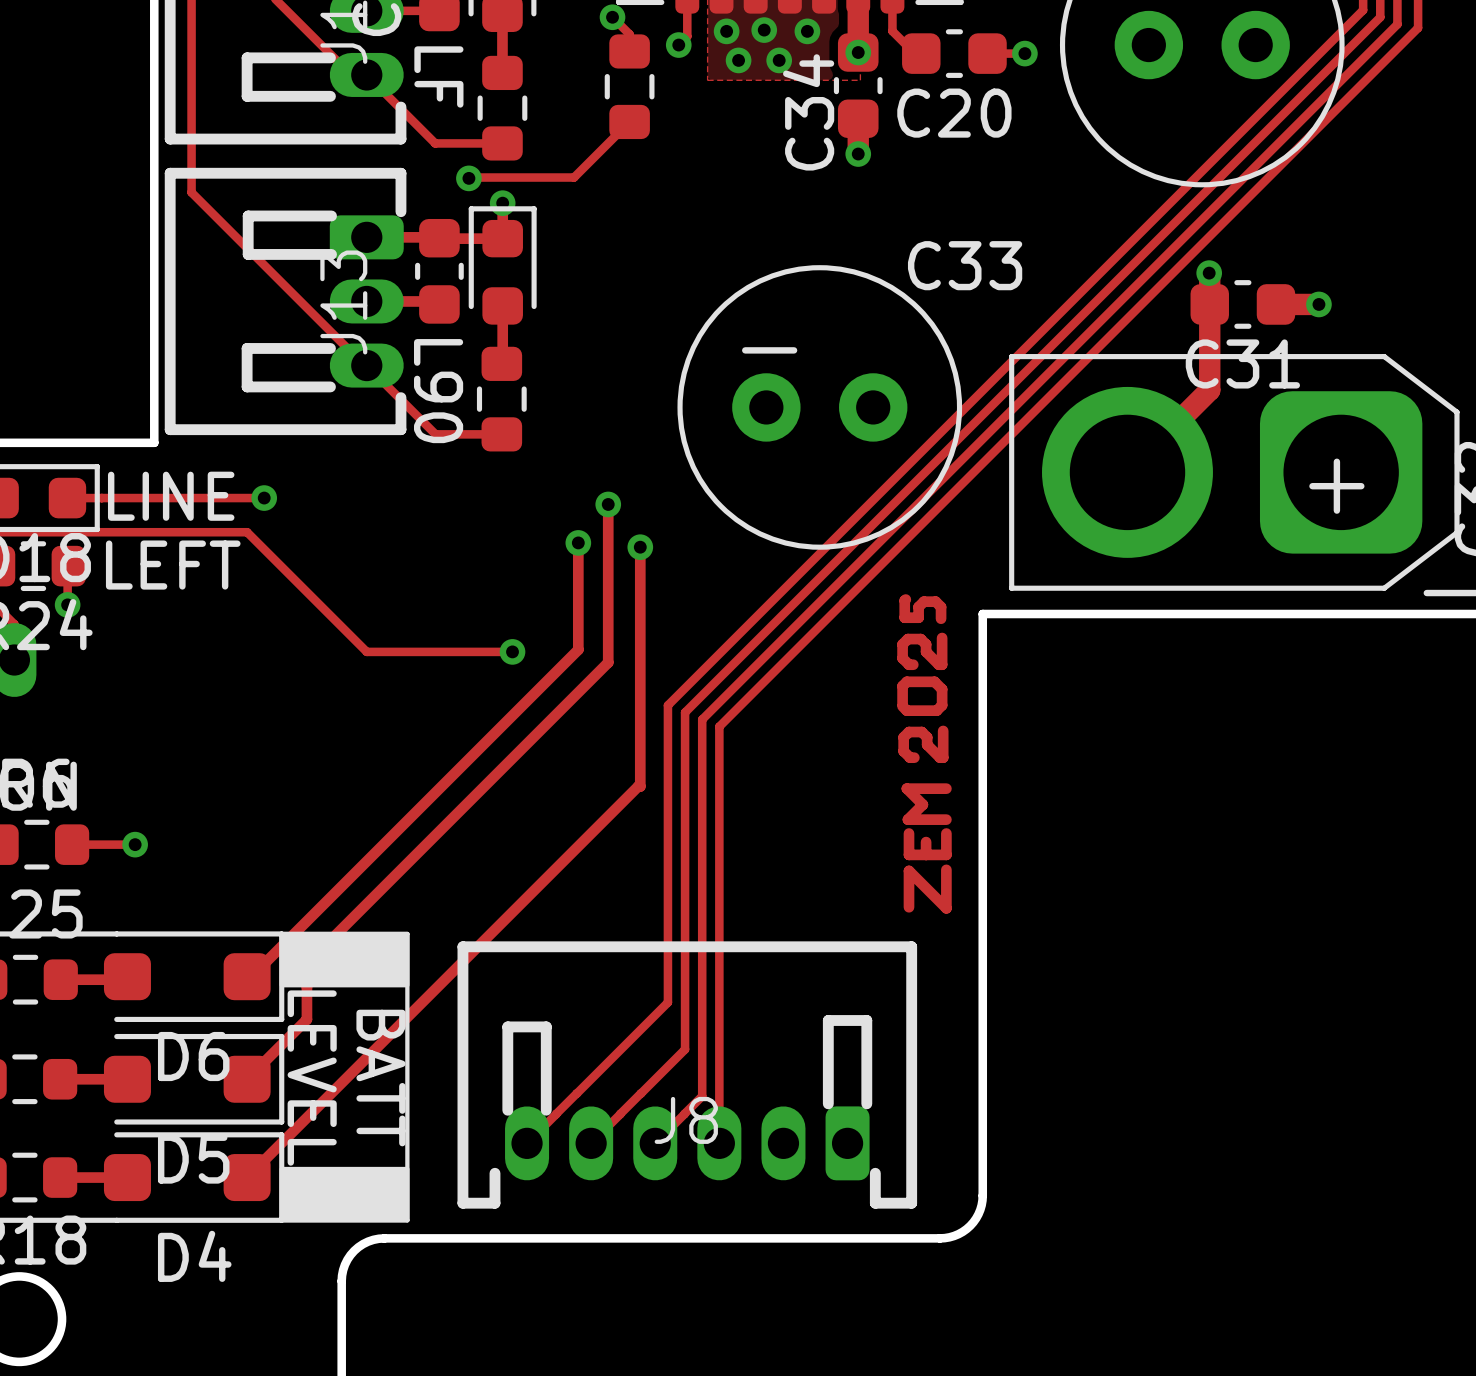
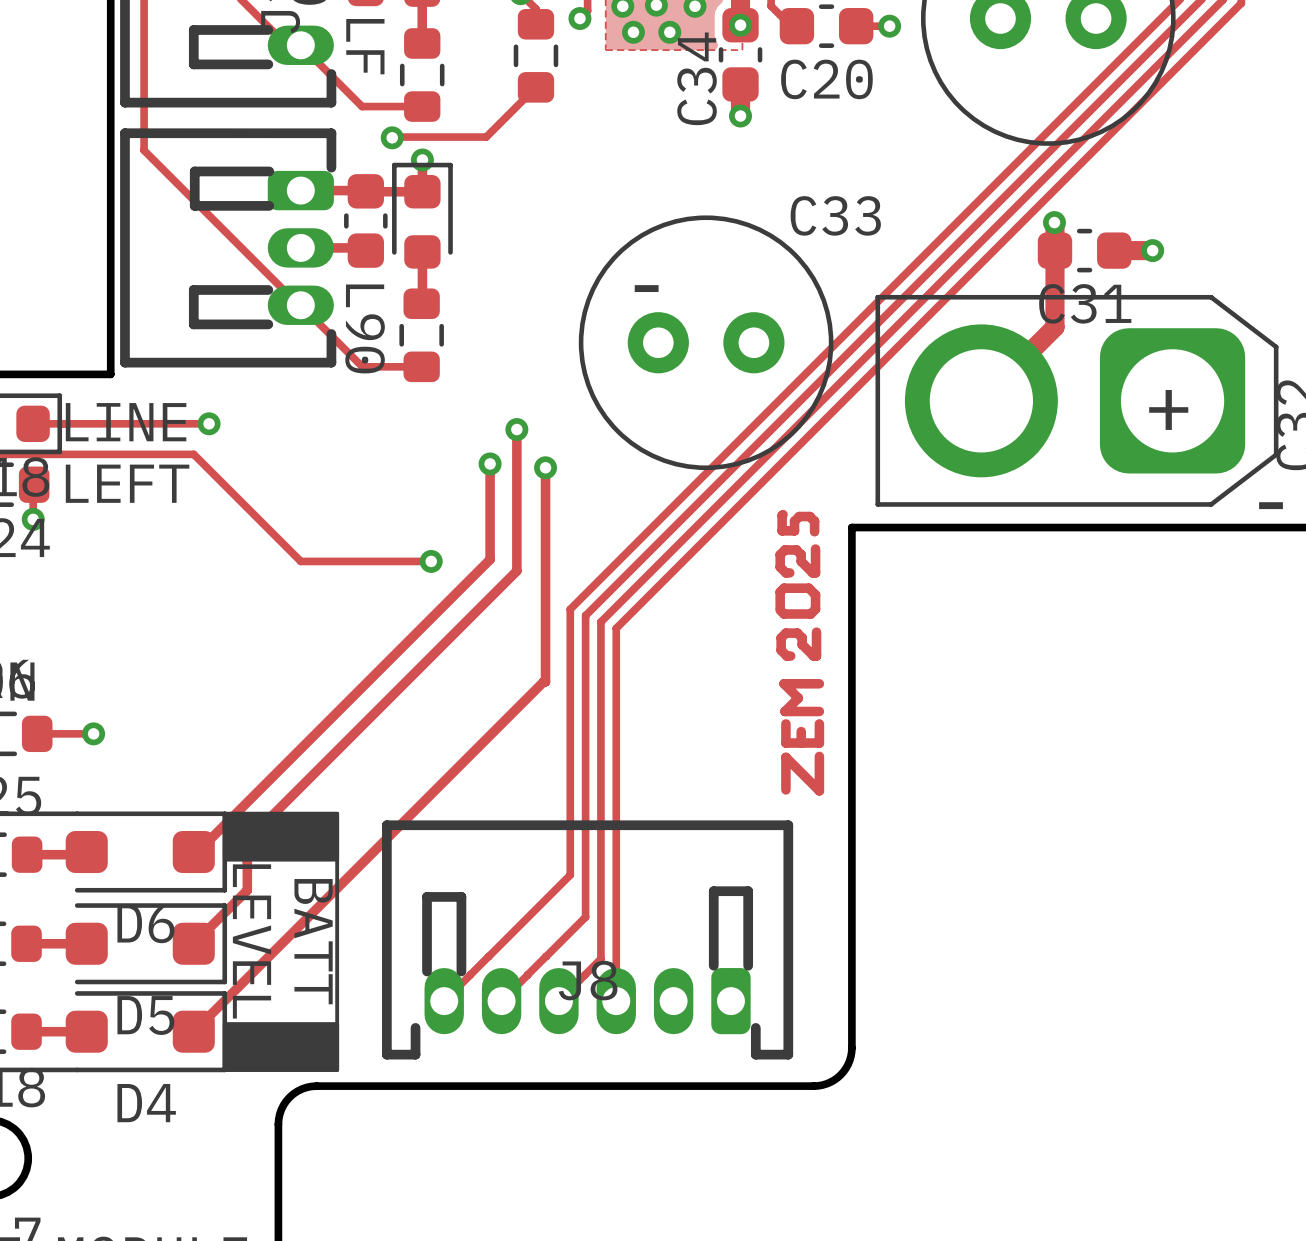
J13 name: J13 (343, 302) -> none

